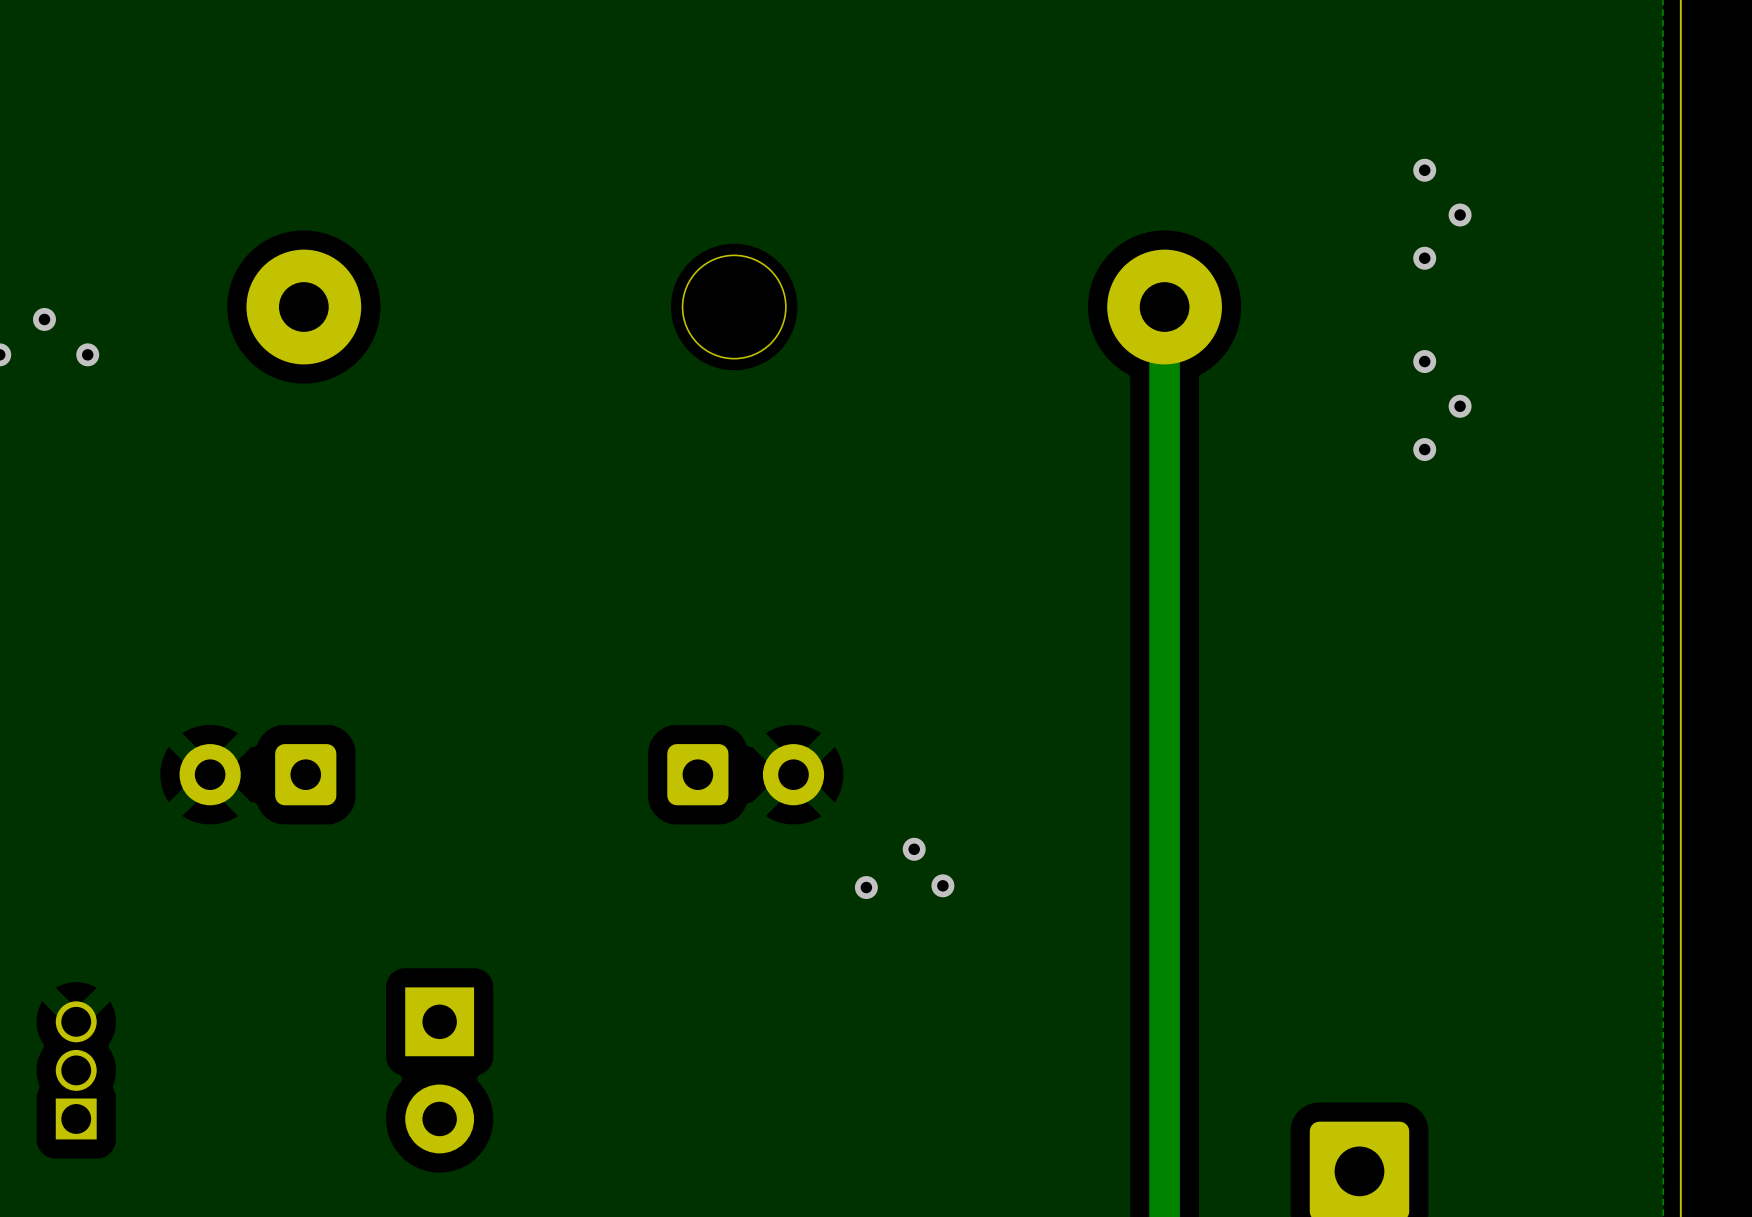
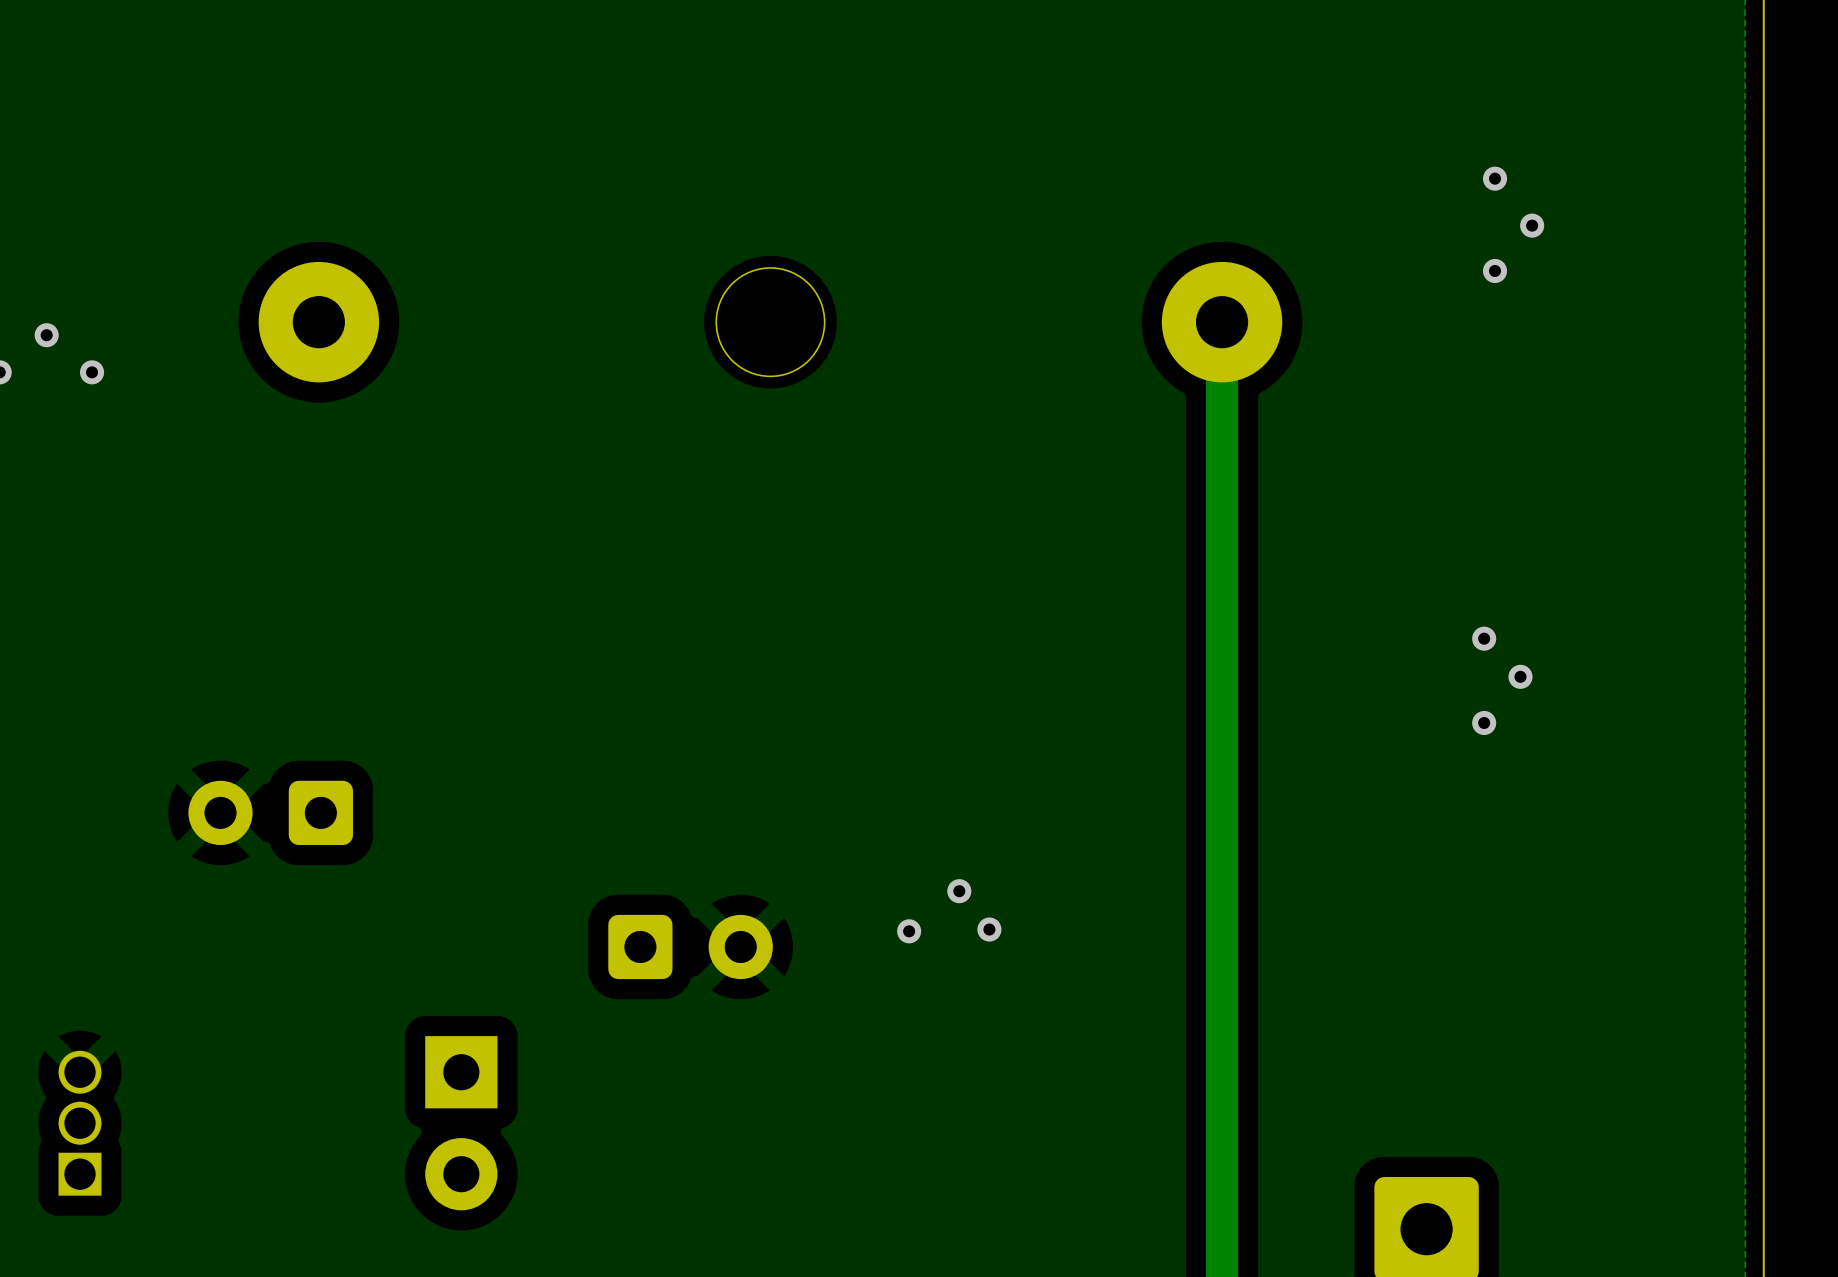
via: (1424, 361) -> none
via: (1460, 406) -> none
via: (1424, 449) -> none
via: none -> (1484, 638)
via: none -> (1520, 676)
via: none -> (1484, 722)
part position: (745, 774) -> (690, 946)

